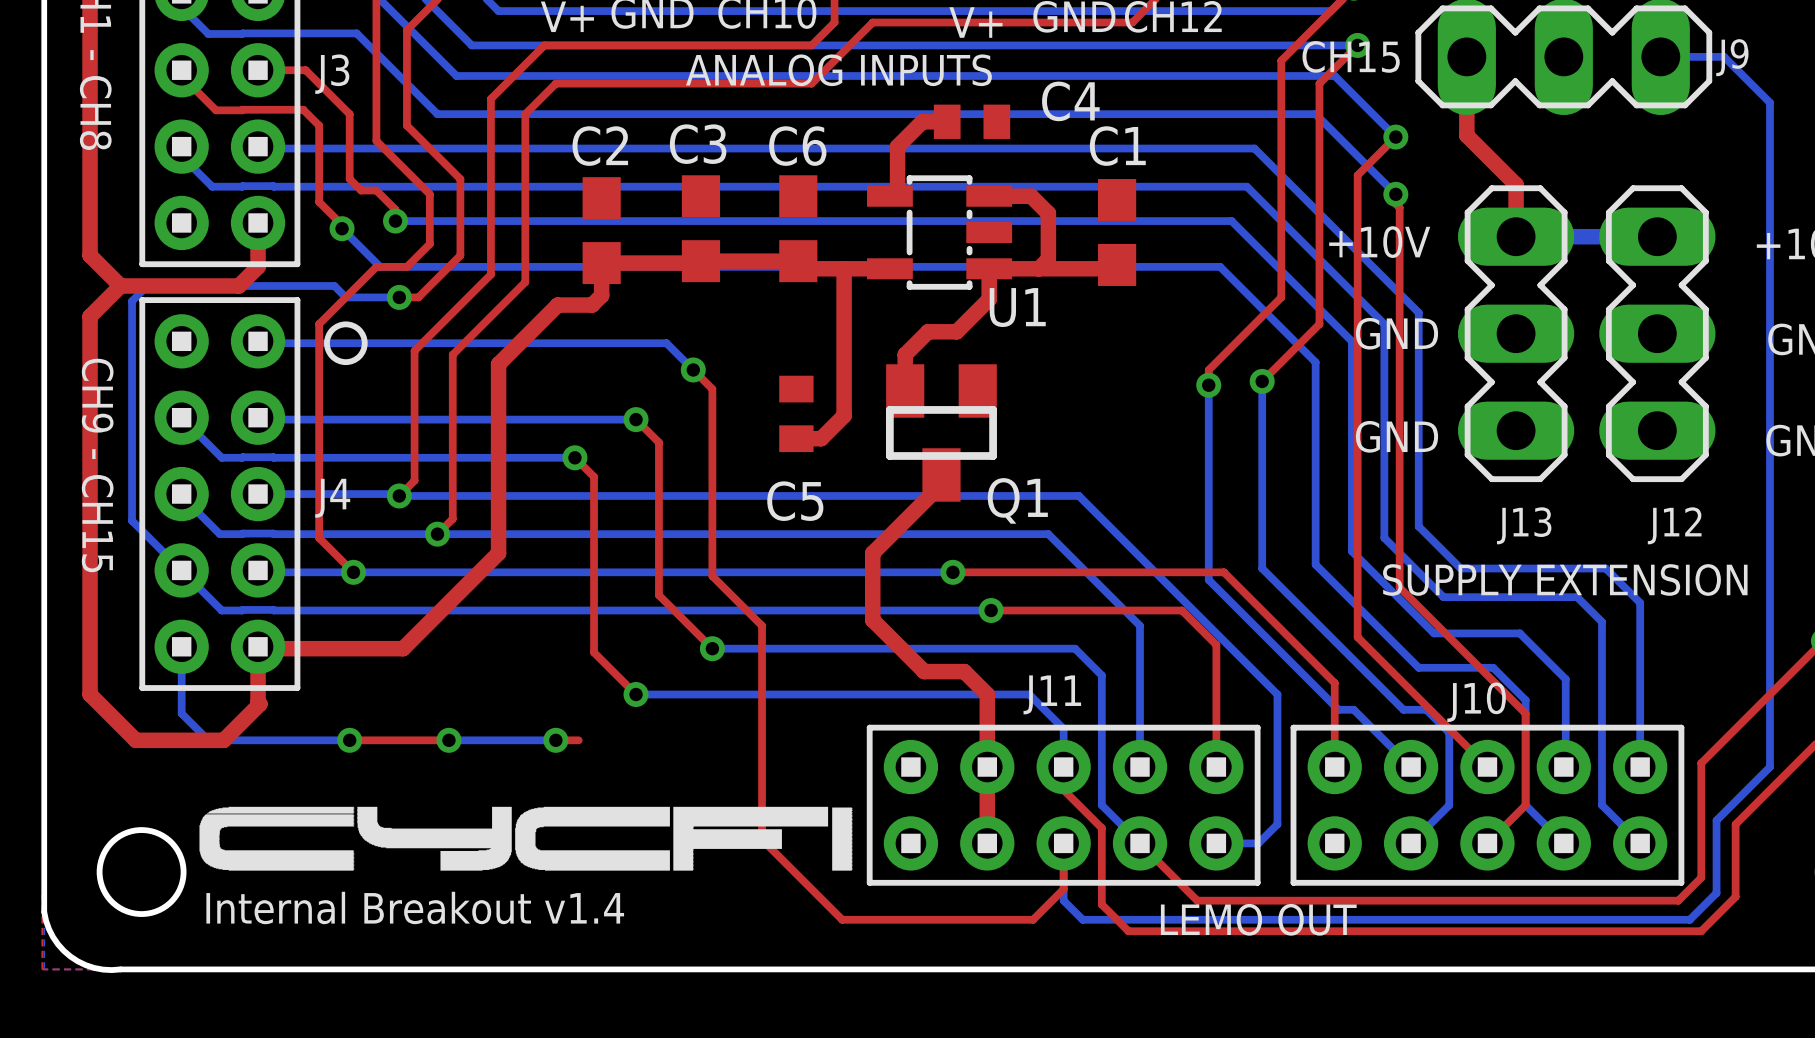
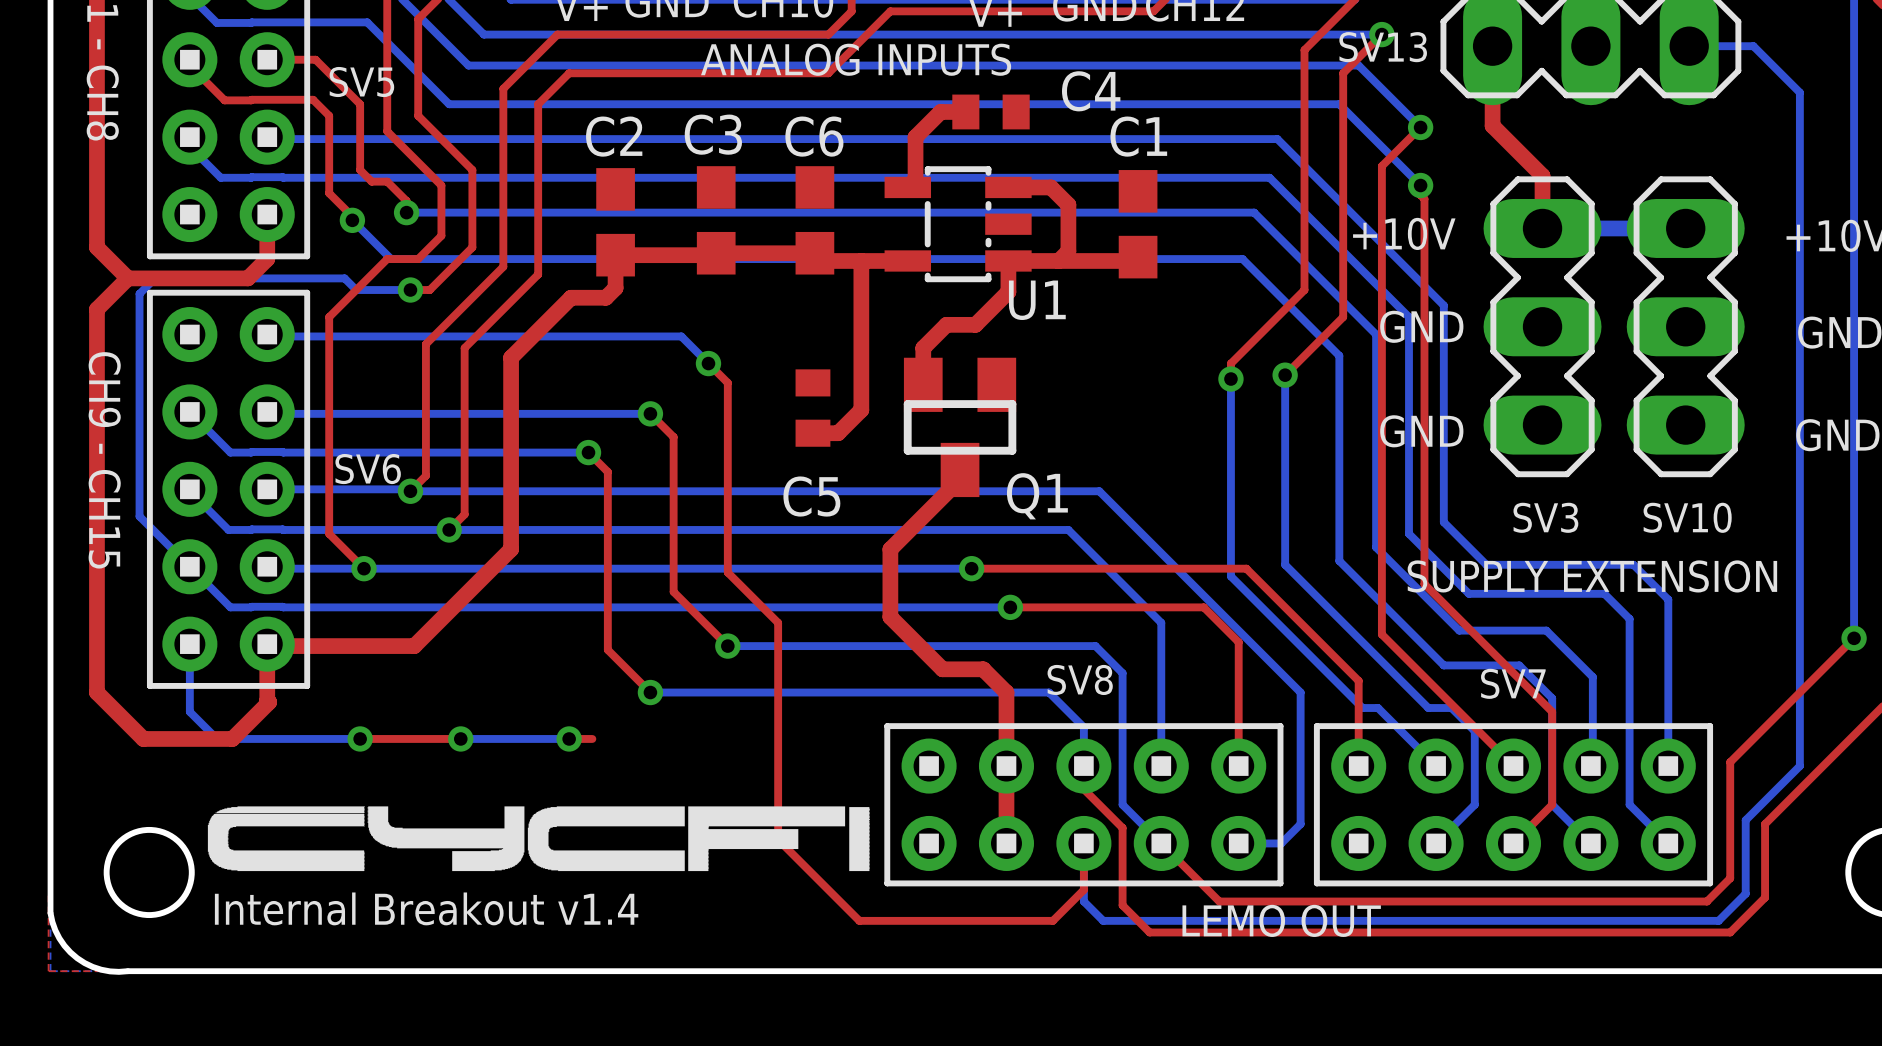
text: CH15 (1351, 56) -> none
J9 name: J9 (1732, 57) -> SV13 (1383, 47)
text: J3 (332, 74) -> SV5 (361, 82)
drawing: [324, 321, 368, 366] -> none
text: J4 (332, 498) -> SV6 (368, 469)
J13 name: J13 (1524, 525) -> SV3 (1545, 517)
J12 name: J12 (1674, 525) -> SV10 (1687, 517)
text: J11 (1052, 694) -> SV8 (1080, 679)
text: J10 (1476, 702) -> SV7 (1513, 683)

